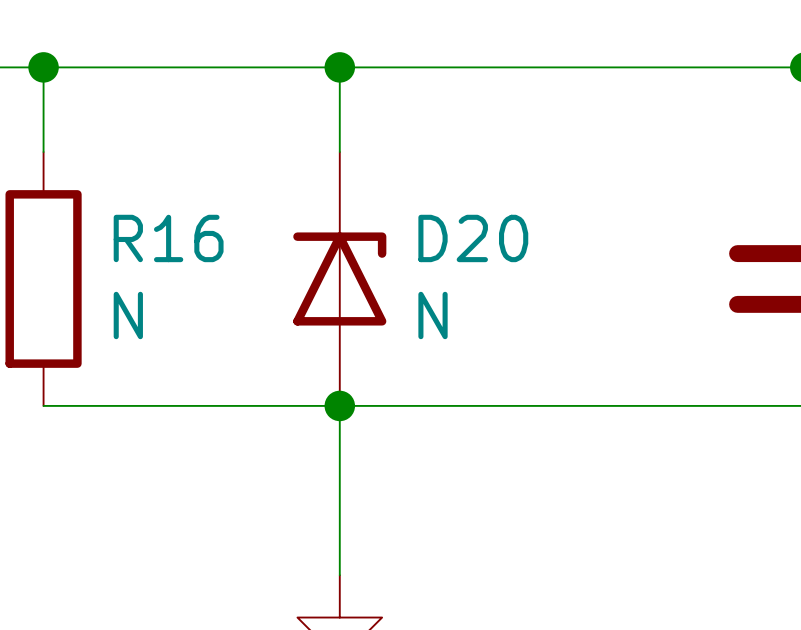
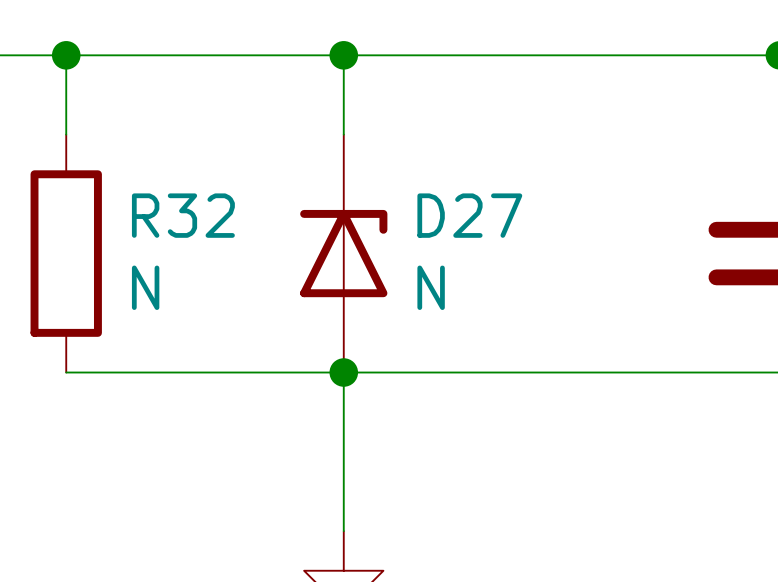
R16 name: R16 (168, 238) -> R32 (183, 215)
D20 name: D20 (473, 238) -> D27 (469, 215)

